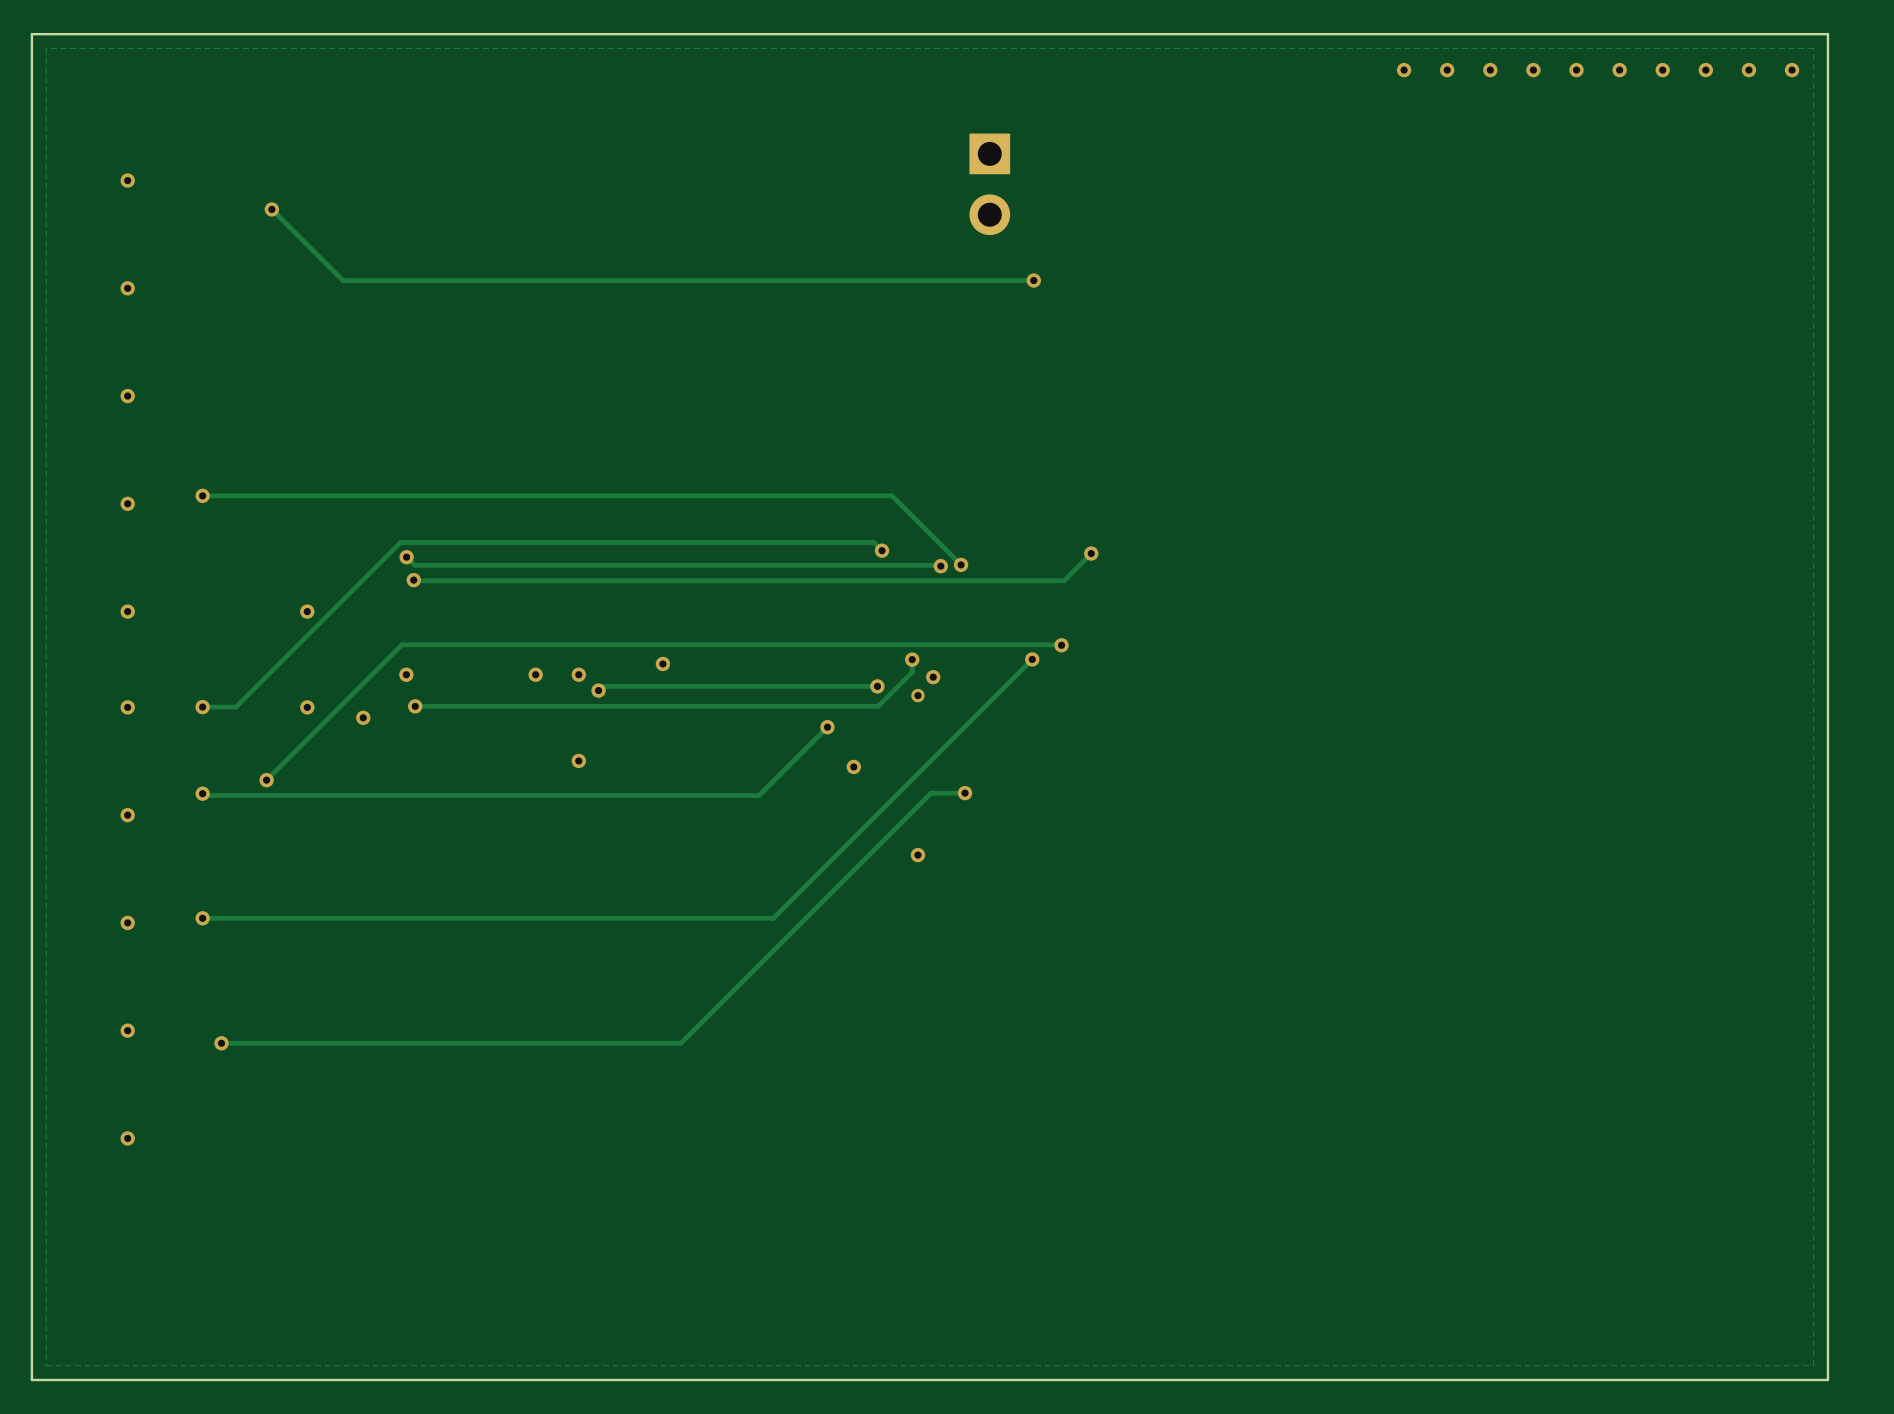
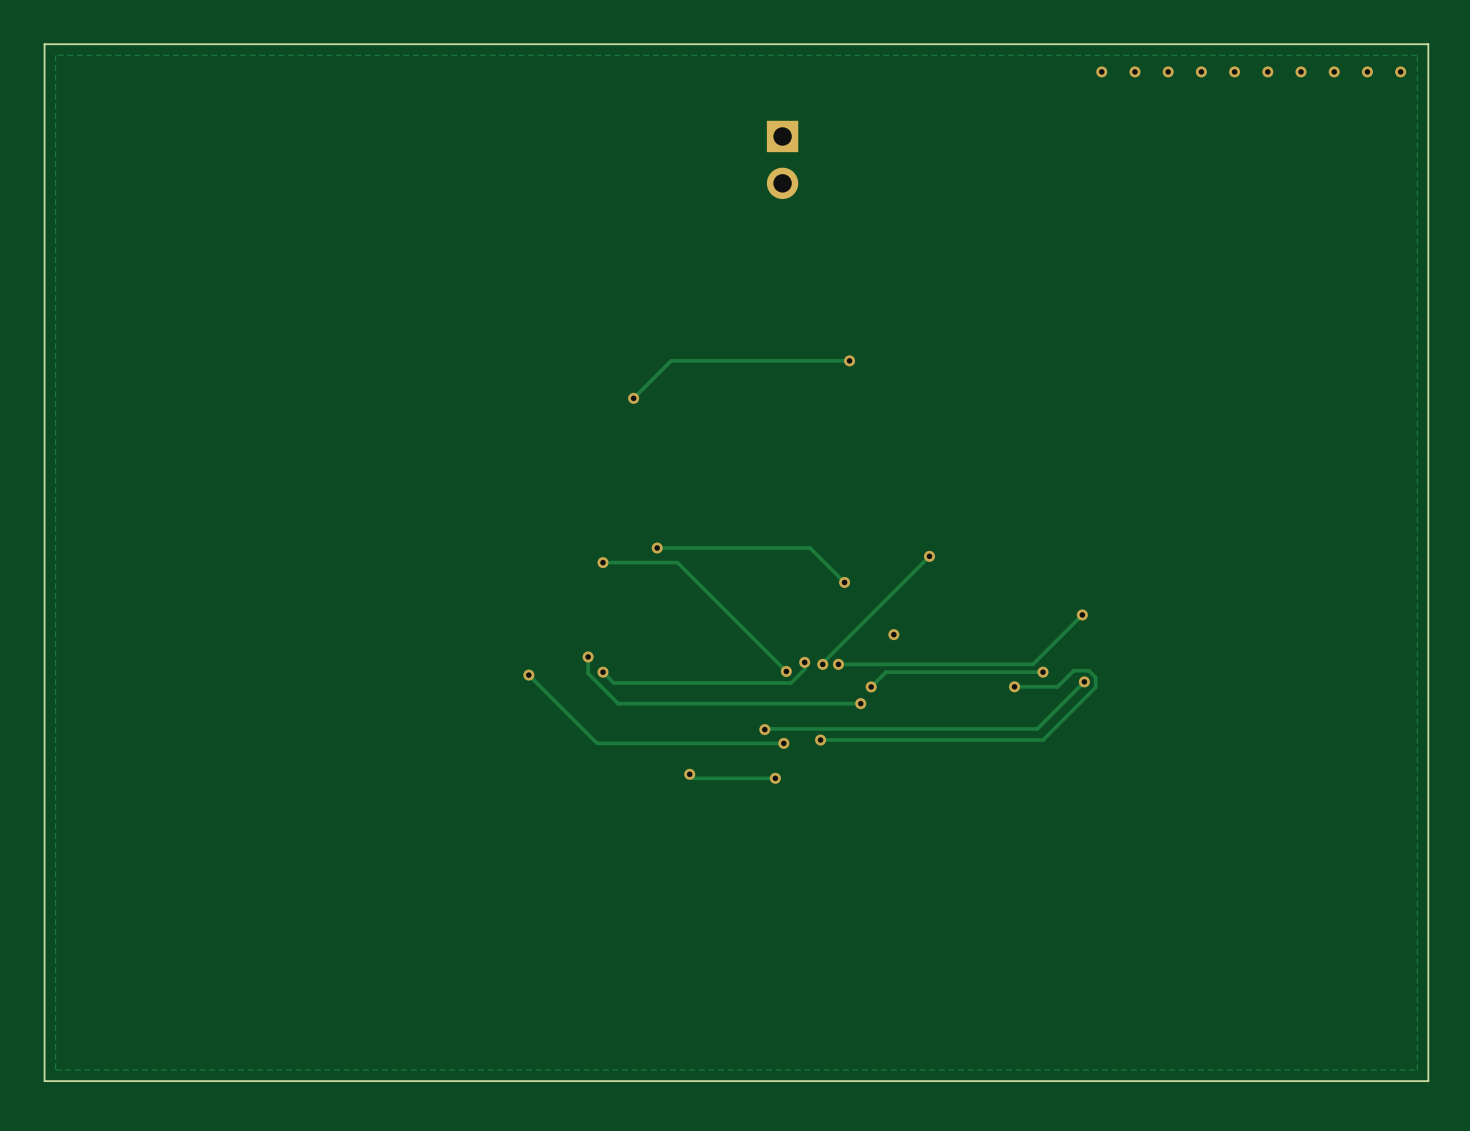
via: (127, 180) -> none
track: (271, 209) (342, 280) (1033, 280) -> none
via: (271, 209) -> none
via: (1033, 280) -> none
via: (127, 288) -> none
via: (127, 396) -> none
track: none -> (849, 360) (671, 360) (633, 398)
via: none -> (849, 360)
via: none -> (633, 398)
track: (202, 495) (892, 495) (961, 564) -> none
via: (202, 495) -> none
via: (127, 503) -> none
track: (882, 550) (873, 542) (400, 542) (235, 707) (202, 707) -> none
via: (882, 550) -> none
track: (1091, 553) (1063, 580) (413, 580) -> none
via: (1091, 553) -> none
track: (406, 557) (414, 565) (940, 566) -> none
via: (406, 557) -> none
via: (961, 564) -> none
via: (940, 566) -> none
via: (413, 580) -> none
via: (127, 611) -> none
via: (307, 611) -> none
track: (1061, 645) (401, 644) (266, 780) -> none
via: (1061, 645) -> none
track: (912, 659) (912, 672) (878, 706) (415, 706) -> none
via: (912, 659) -> none
track: (1032, 659) (773, 918) (202, 918) -> none
via: (1032, 659) -> none
via: (662, 663) -> none
via: (406, 674) -> none
via: (535, 674) -> none
via: (578, 674) -> none
via: (933, 677) -> none
track: (877, 686) (602, 686) (598, 690) -> none
via: (877, 686) -> none
track: none -> (657, 548) (810, 548) (844, 582)
via: none -> (657, 548)
via: (598, 690) -> none
via: (917, 695) -> none
track: none -> (929, 556) (822, 664)
via: none -> (929, 556)
via: (415, 706) -> none
via: (127, 707) -> none
via: (202, 707) -> none
via: (307, 707) -> none
track: none -> (602, 562) (677, 562) (786, 671)
via: none -> (602, 562)
via: (363, 717) -> none
track: (827, 727) (759, 795) (204, 795) (202, 793) -> none
via: (827, 727) -> none
via: none -> (844, 582)
via: (578, 760) -> none
via: (853, 766) -> none
track: none -> (1082, 614) (1032, 664) (838, 664)
via: none -> (1082, 614)
via: (266, 780) -> none
via: (202, 793) -> none
track: (965, 793) (930, 793) (680, 1043) (221, 1043) -> none
via: (965, 793) -> none
via: none -> (893, 634)
via: (127, 815) -> none
track: none -> (588, 656) (588, 673) (618, 703) (860, 703)
via: none -> (588, 656)
track: none -> (804, 662) (804, 669) (791, 683) (613, 683) (603, 672)
via: none -> (804, 662)
via: none -> (822, 664)
via: none -> (838, 664)
via: none -> (786, 671)
via: none -> (603, 672)
track: none -> (1043, 672) (885, 672) (871, 686)
via: none -> (1043, 672)
track: none -> (528, 675) (597, 743) (783, 743)
via: none -> (528, 675)
via: (917, 855) -> none
track: none -> (1084, 681) (1037, 728) (764, 729)
via: none -> (1084, 681)
via: none -> (871, 686)
track: none -> (1014, 686) (1057, 686) (1073, 670) (1089, 670) (1095, 677) (1095, 687) (1043, 740) (820, 740)
via: none -> (1014, 686)
via: none -> (860, 703)
via: (202, 918) -> none
via: (127, 922) -> none
via: none -> (764, 729)
via: none -> (820, 740)
via: none -> (783, 743)
track: none -> (689, 774) (693, 778) (775, 778)
via: none -> (689, 774)
via: none -> (775, 778)
via: (127, 1030) -> none
via: (221, 1043) -> none
via: (127, 1138) -> none

